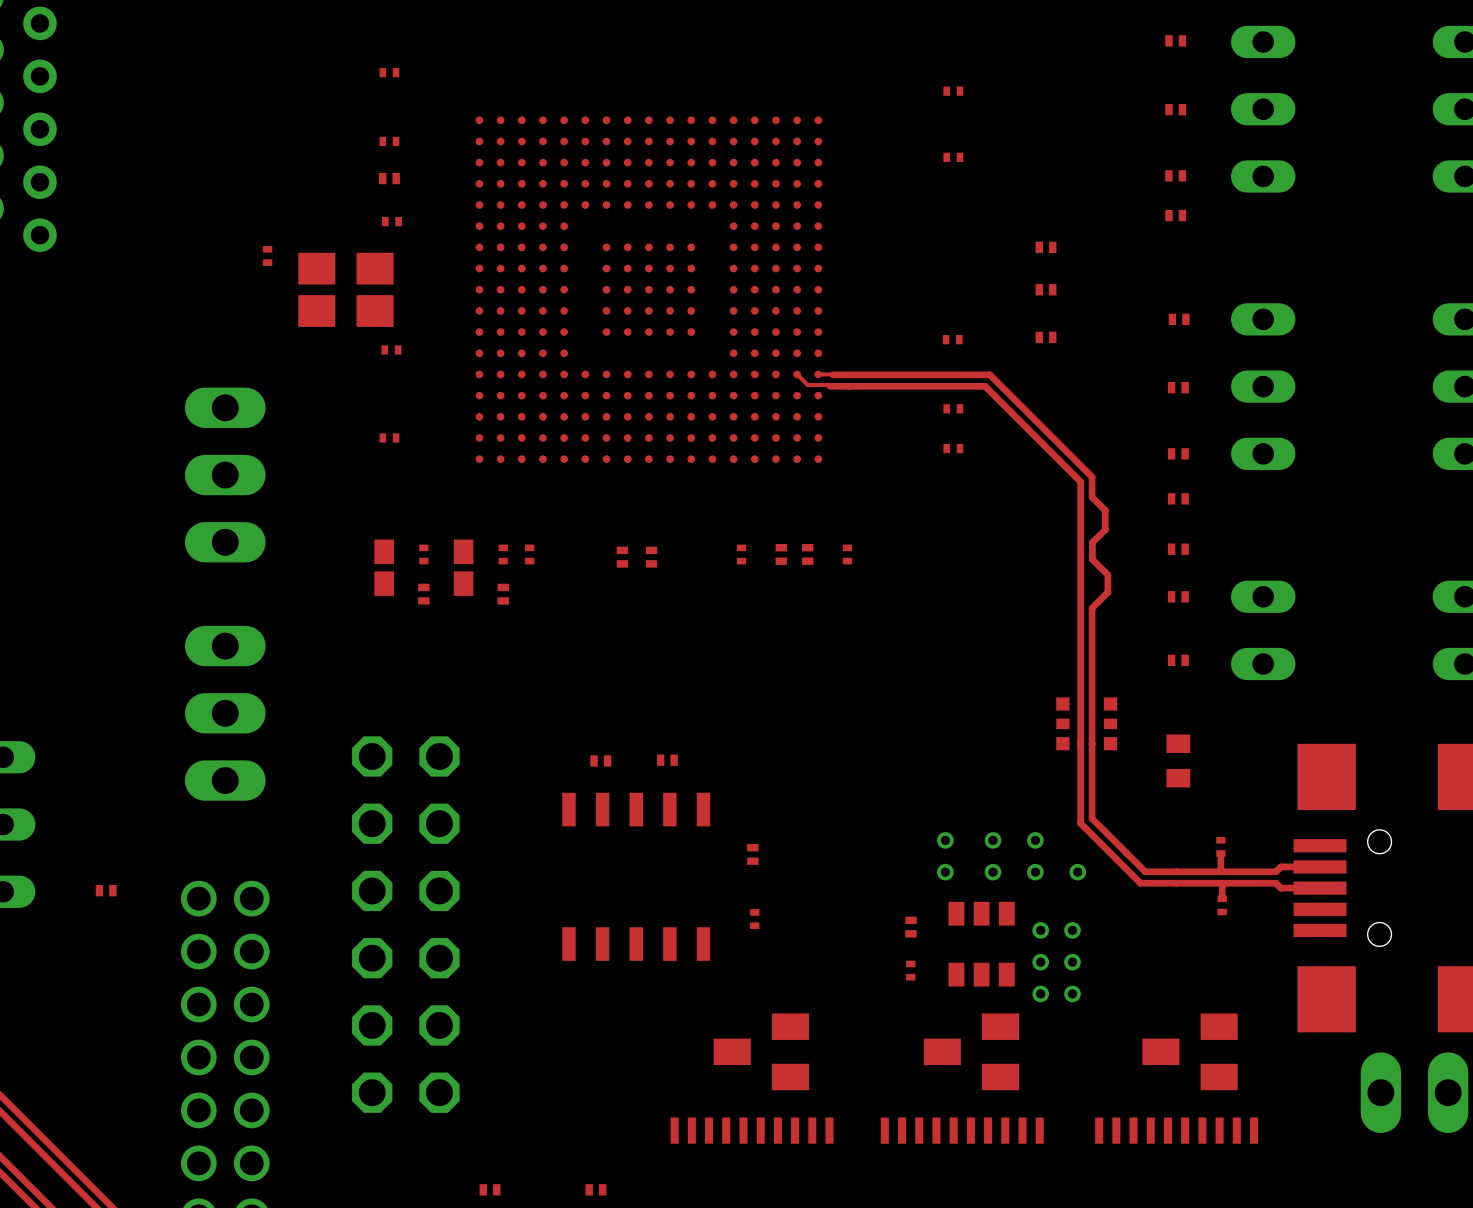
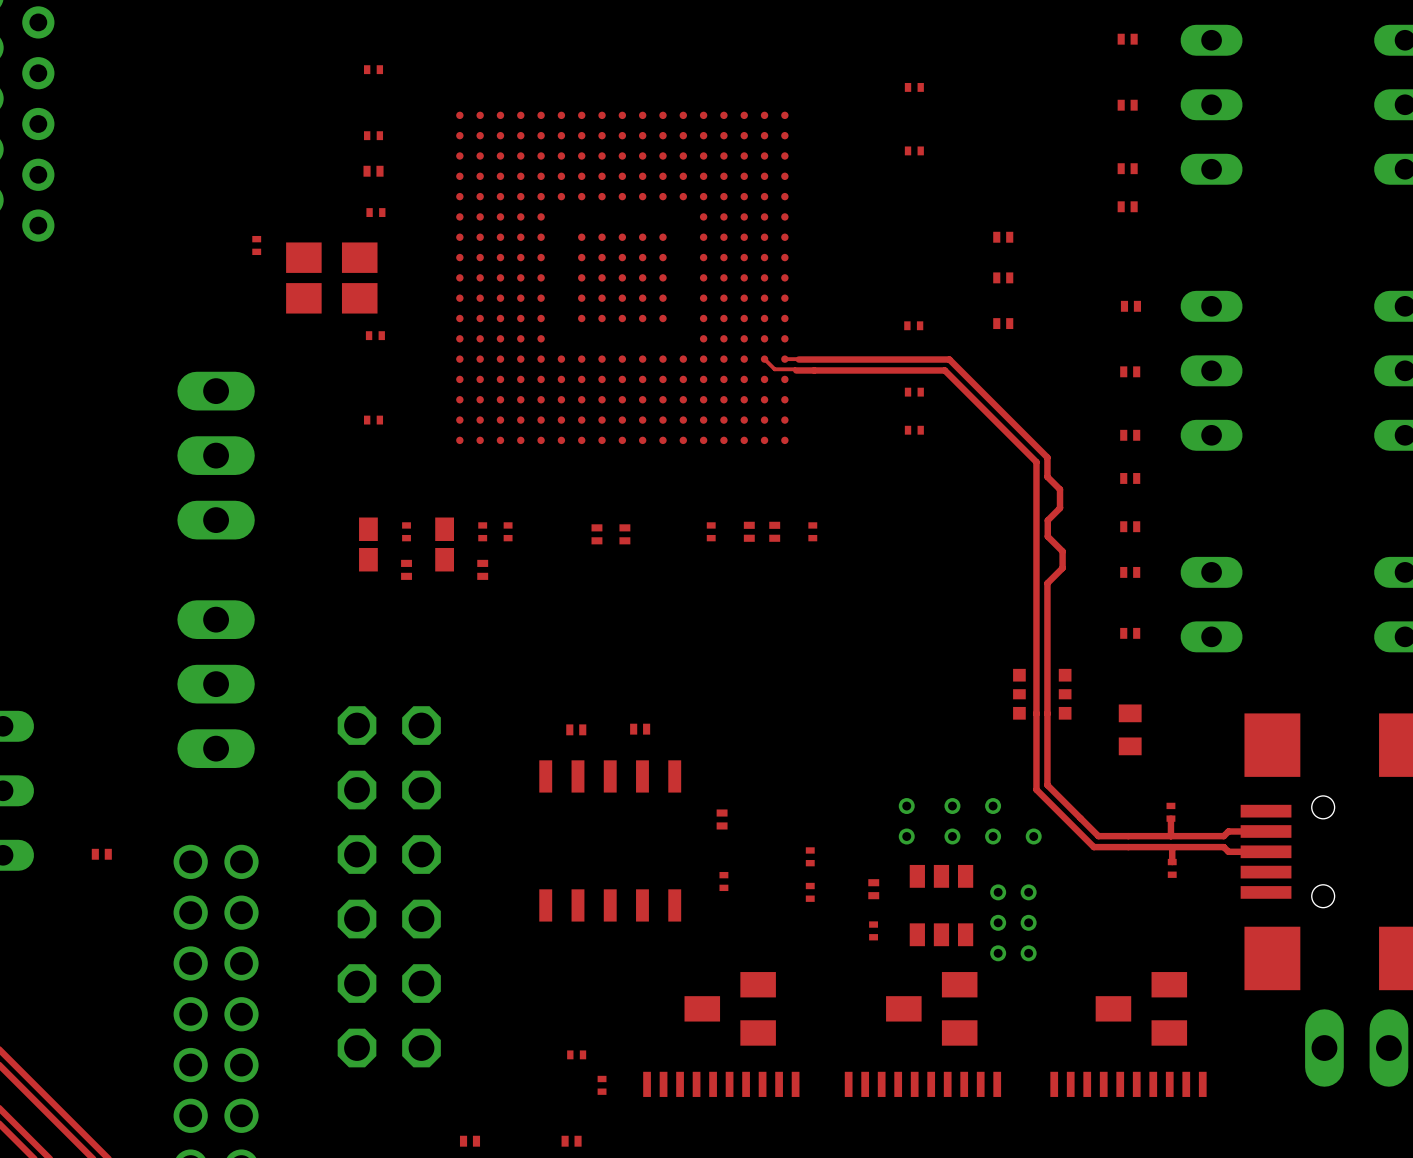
part: none -> (810, 856)
part: none -> (810, 892)
part: none -> (576, 1054)
part: none -> (602, 1085)

